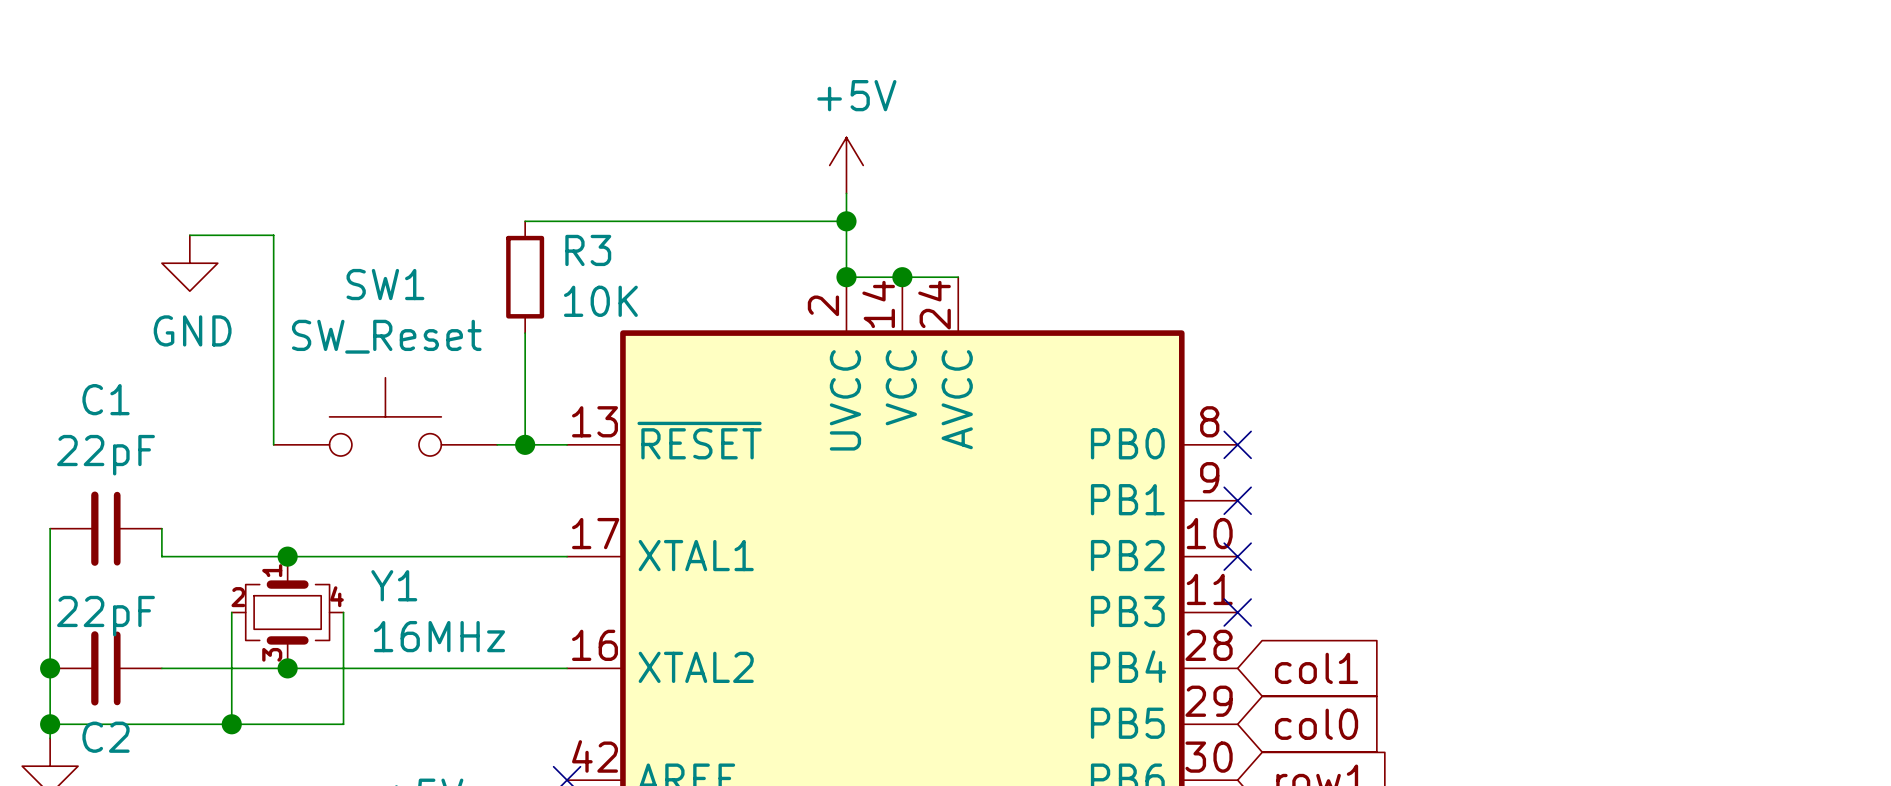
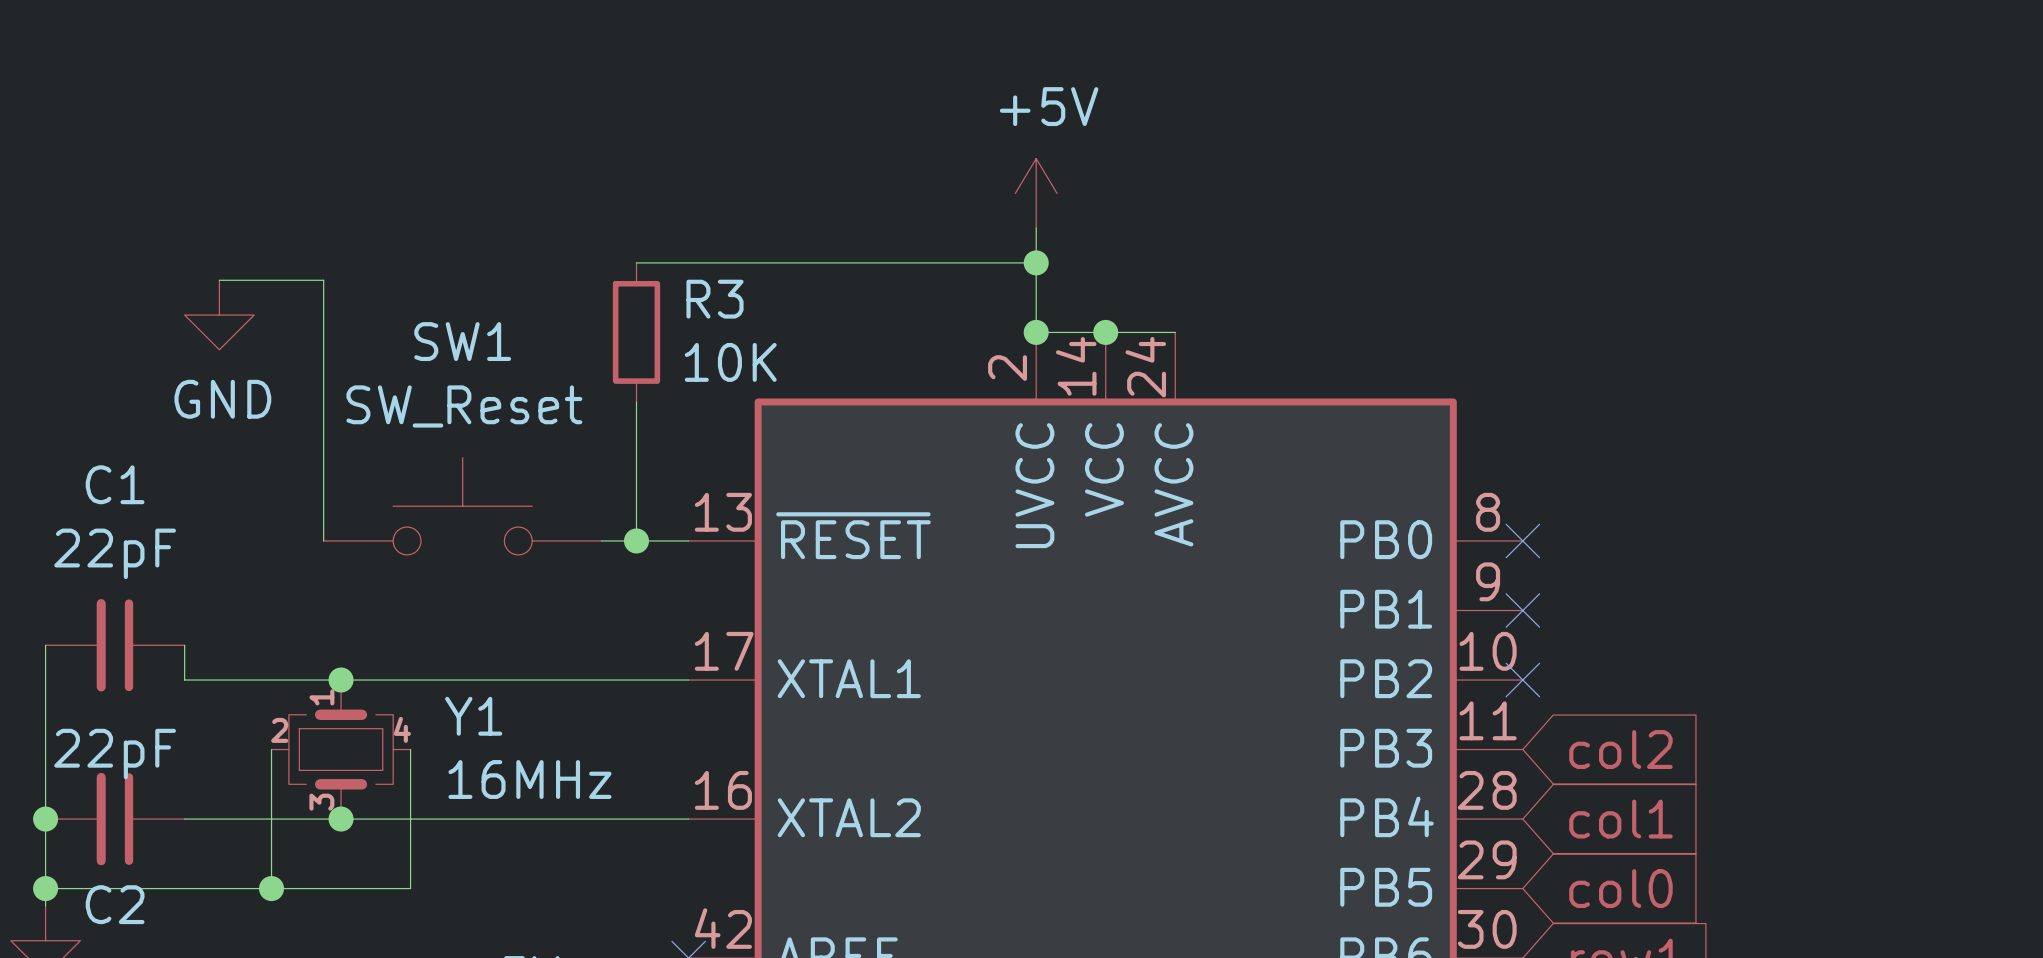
no-connect mark: (1237, 612) -> none
global label: none -> col2 (1620, 749)

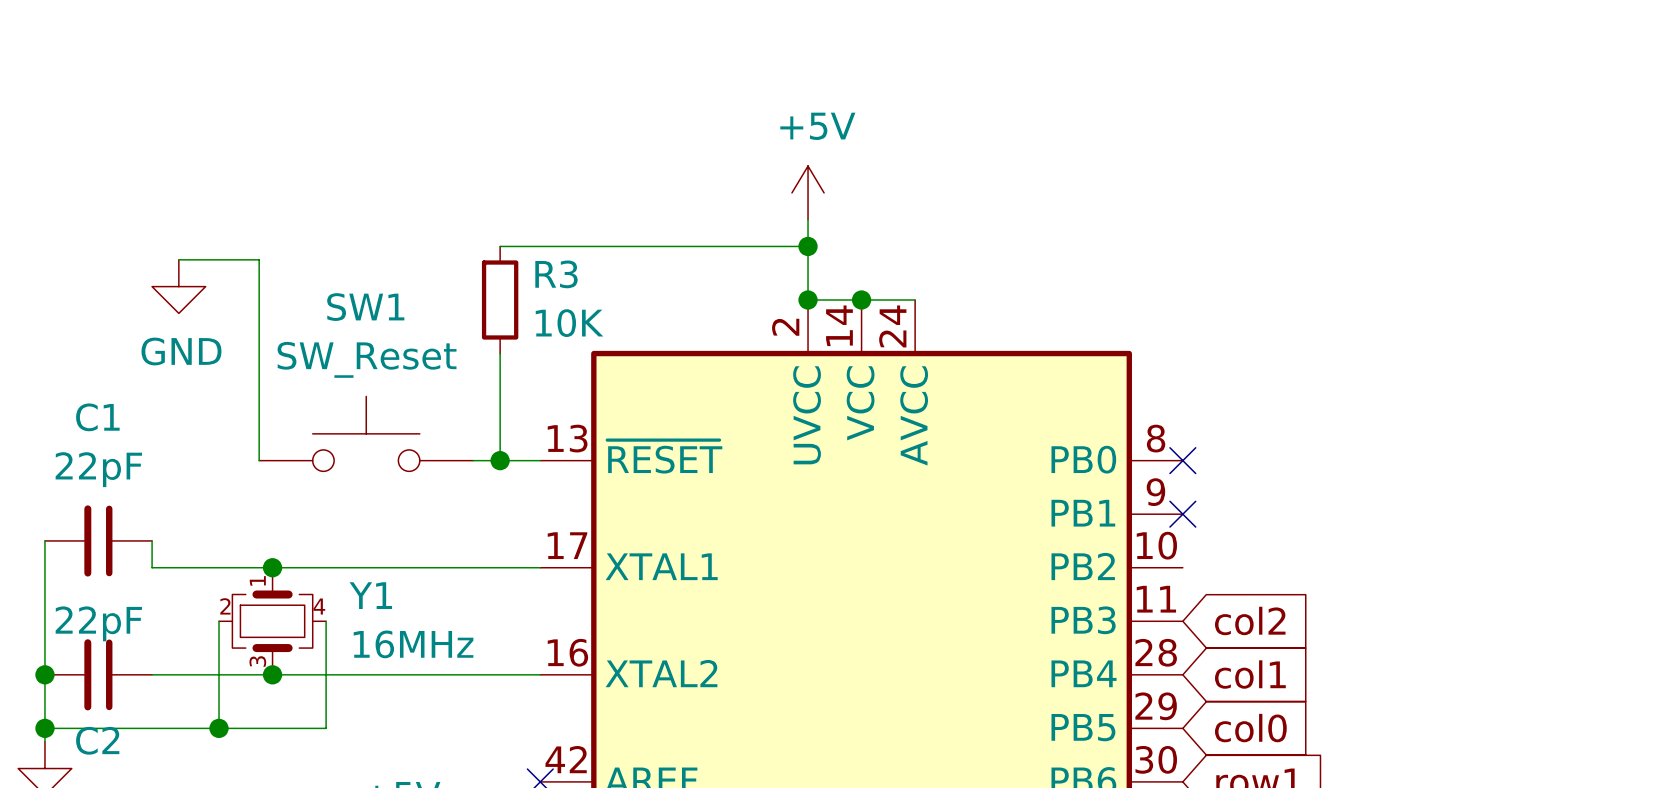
no-connect mark: (1522, 680) -> none

